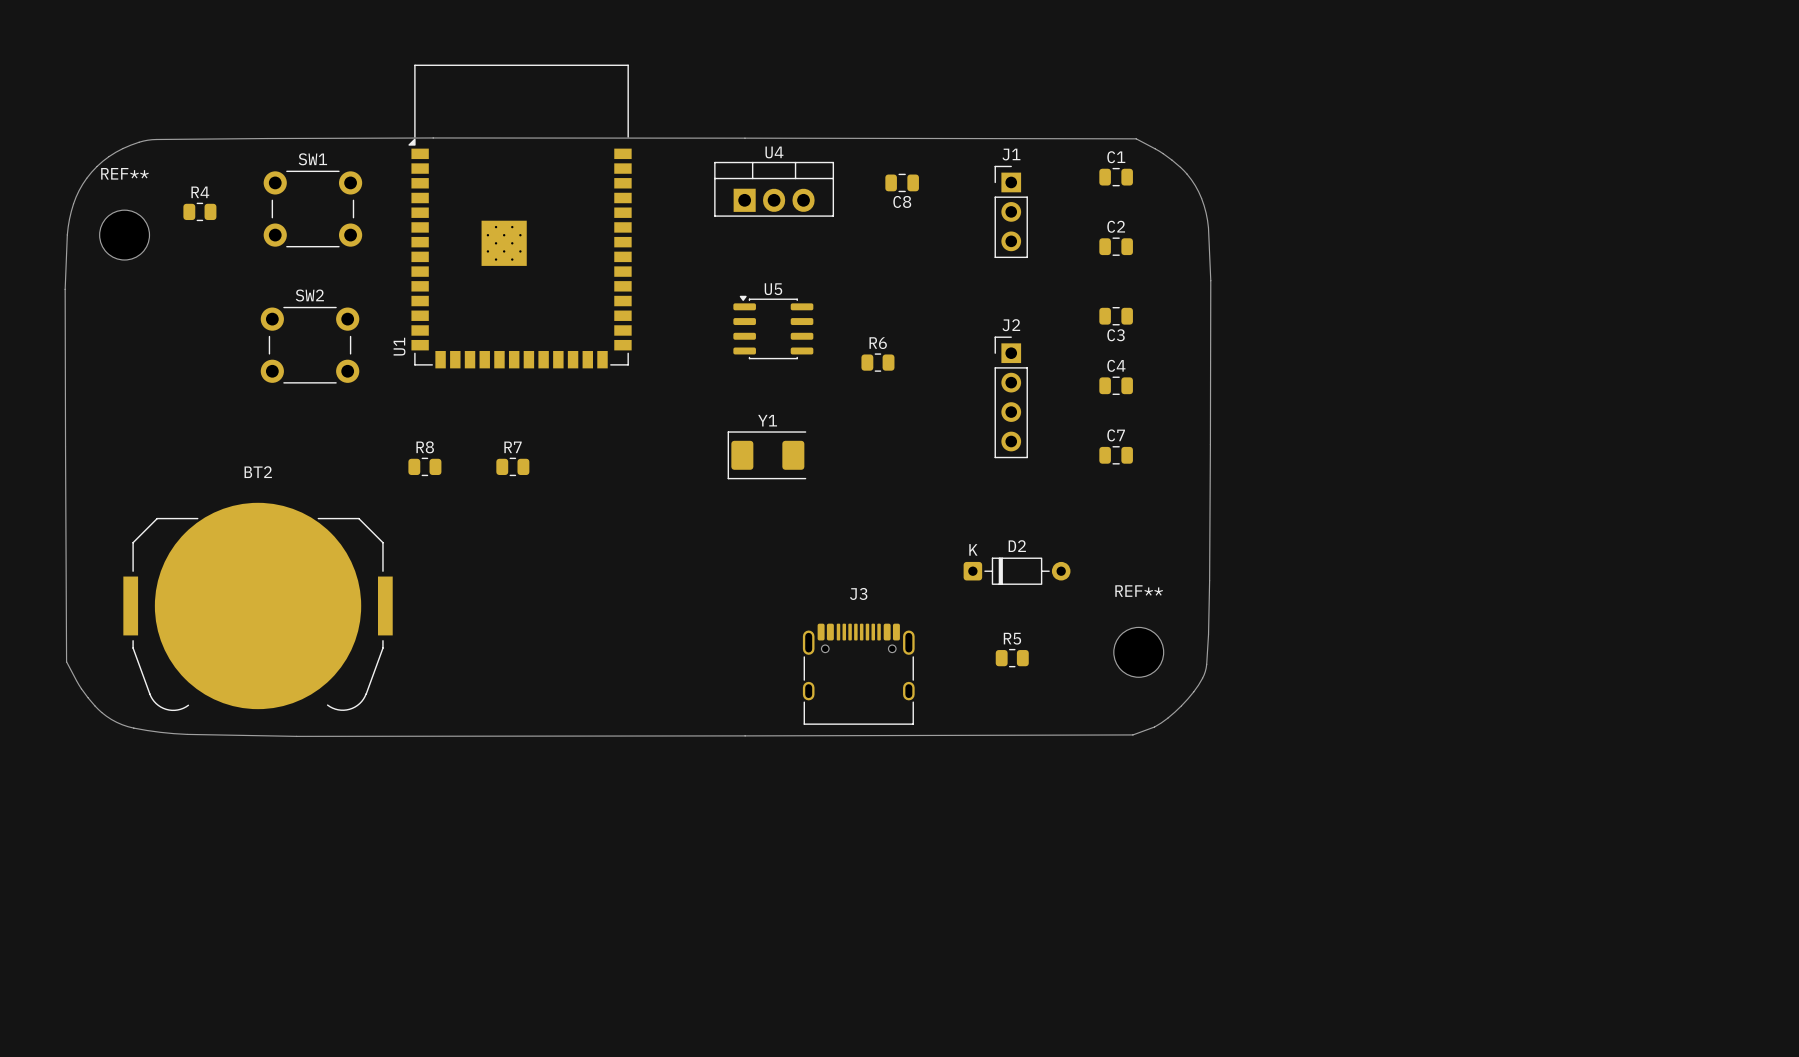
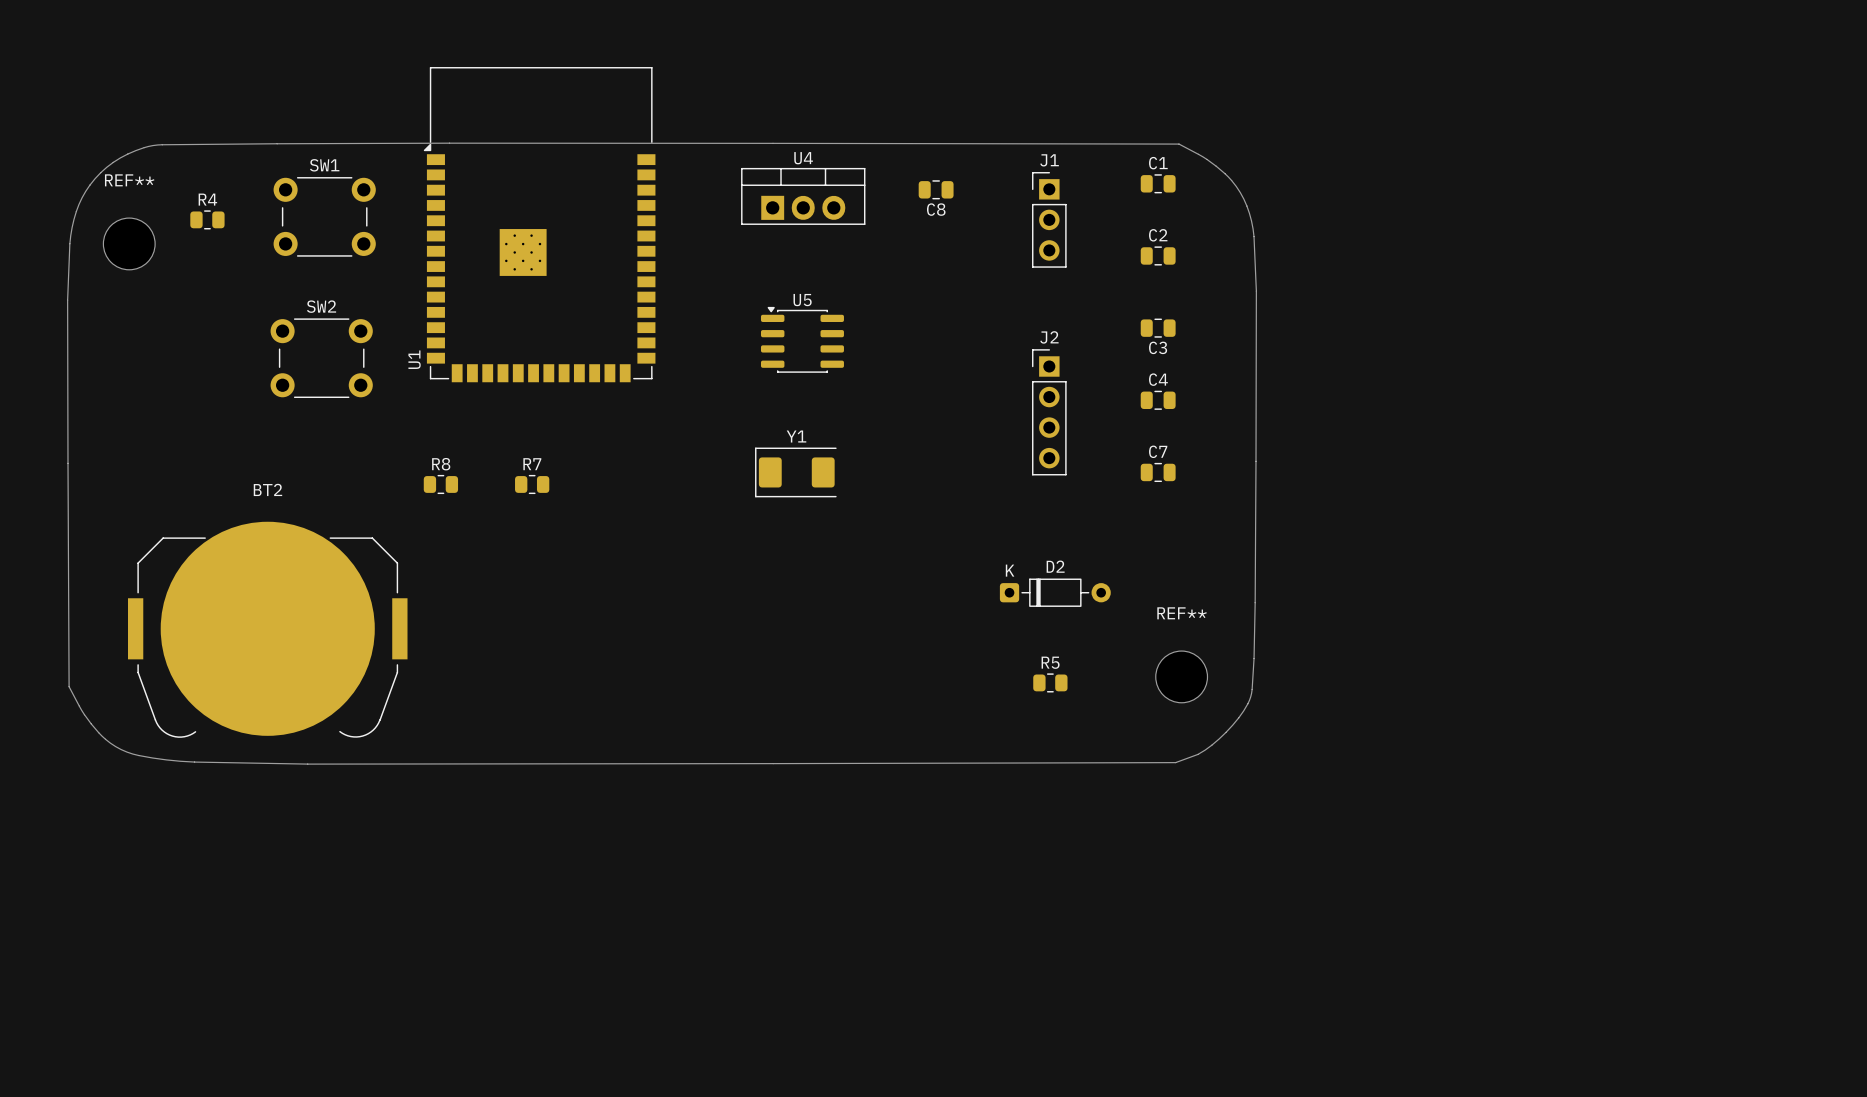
R6: (877, 362) -> none
J3: (858, 674) -> none

